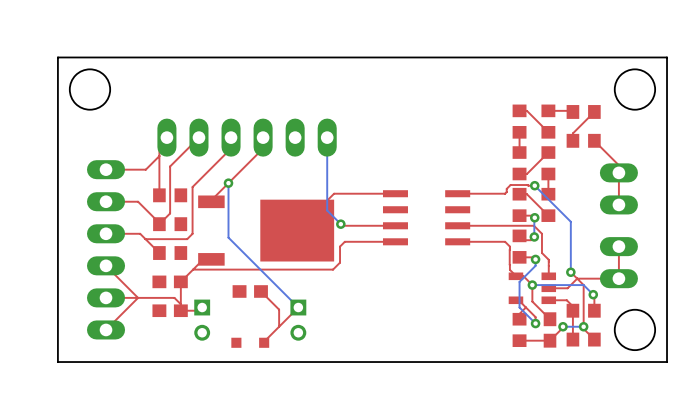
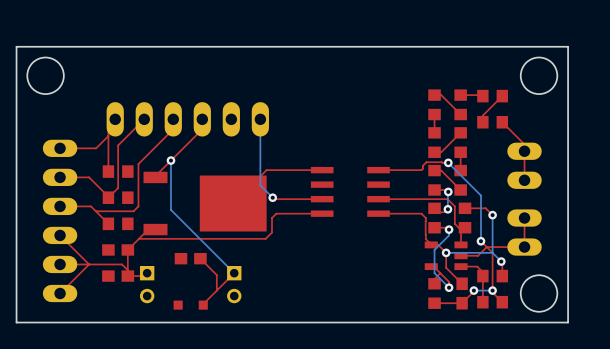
top track: none -> (465, 208) (485, 208) (492, 215)
bottom track: none -> (492, 215) (492, 252)
via: none -> (492, 215)
part: none -> (465, 218)

